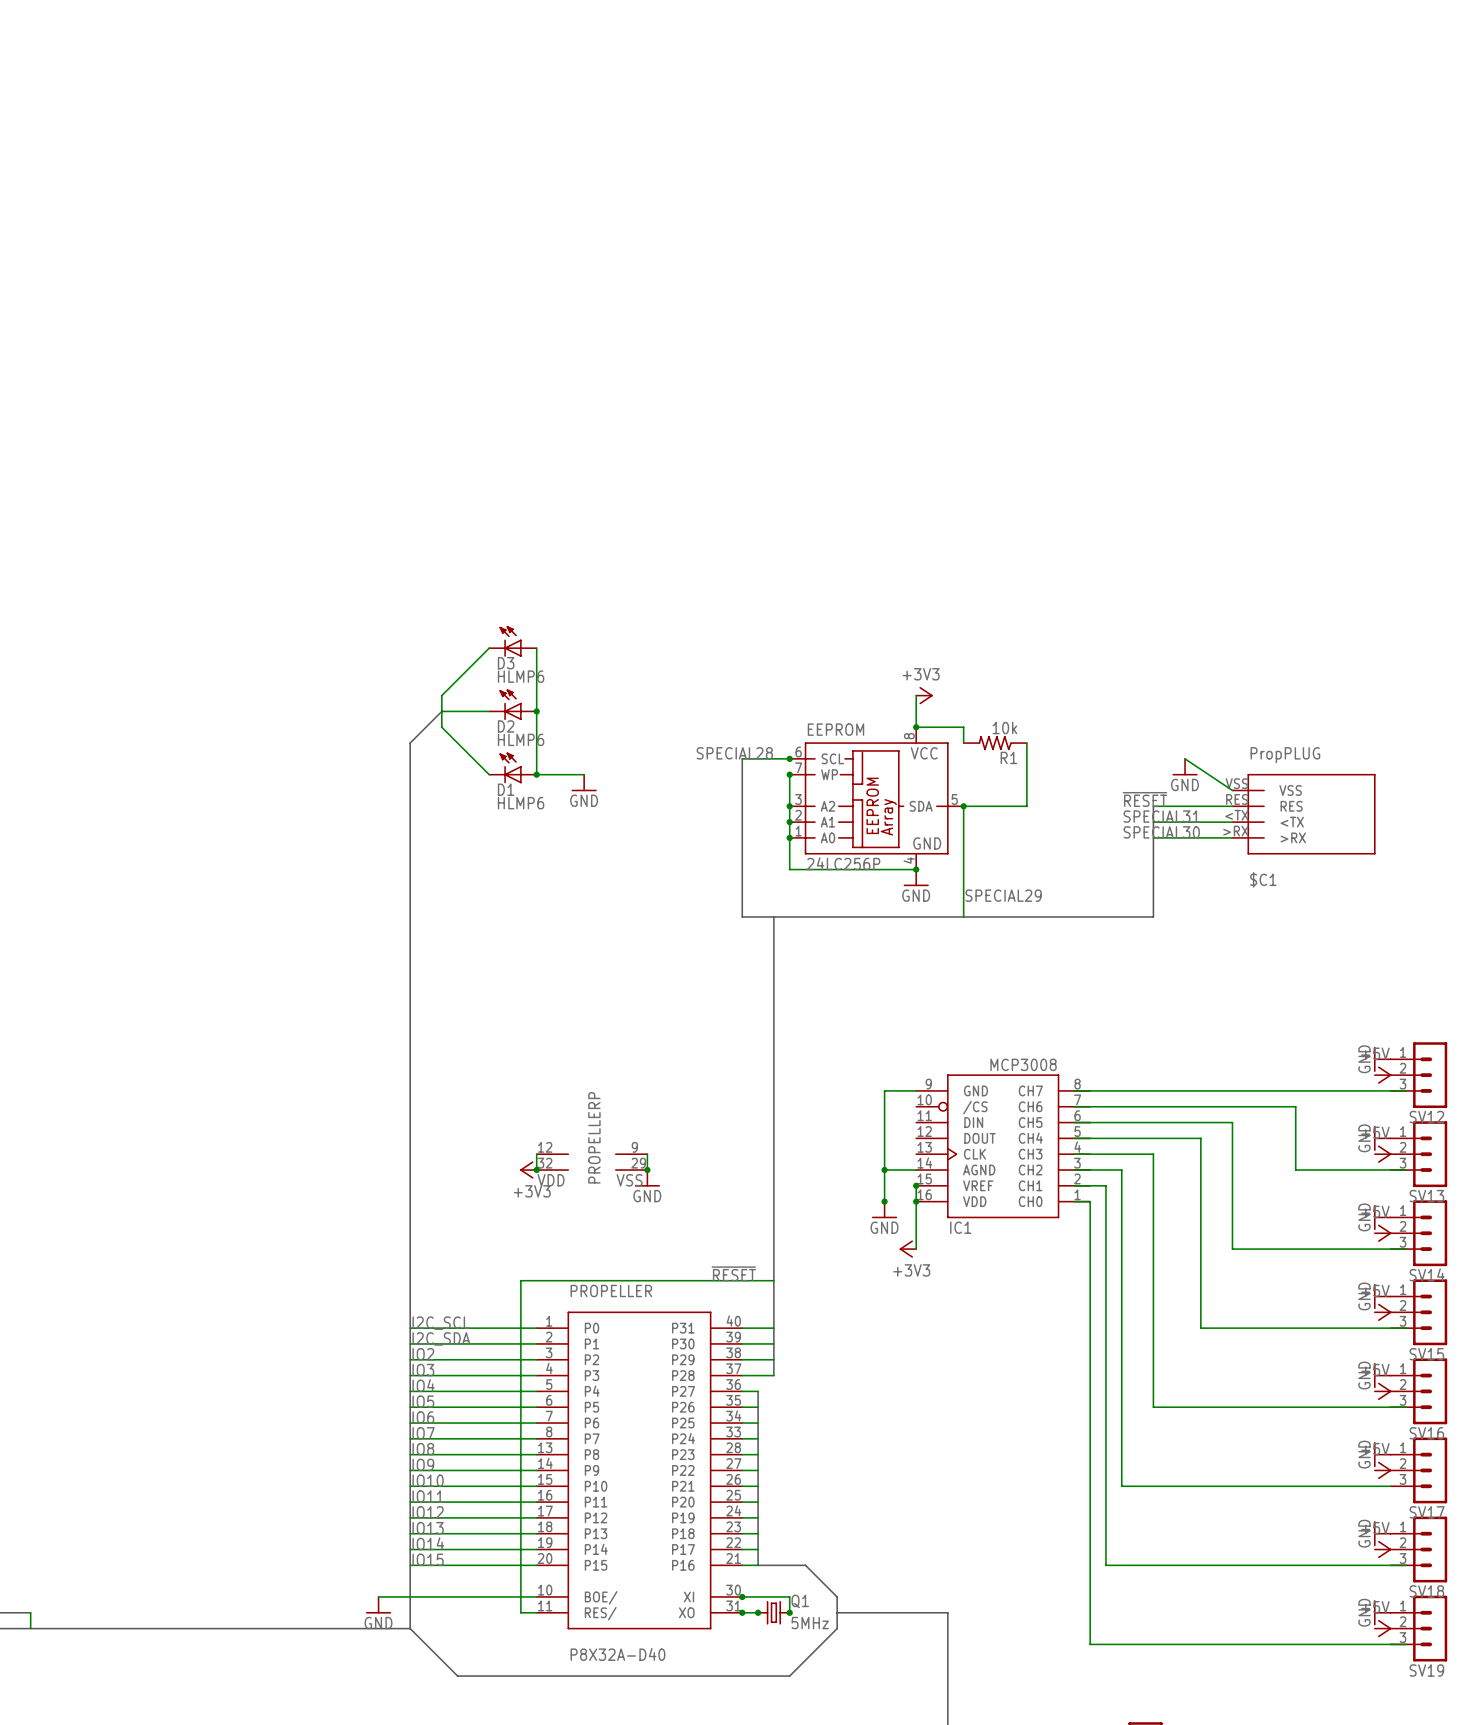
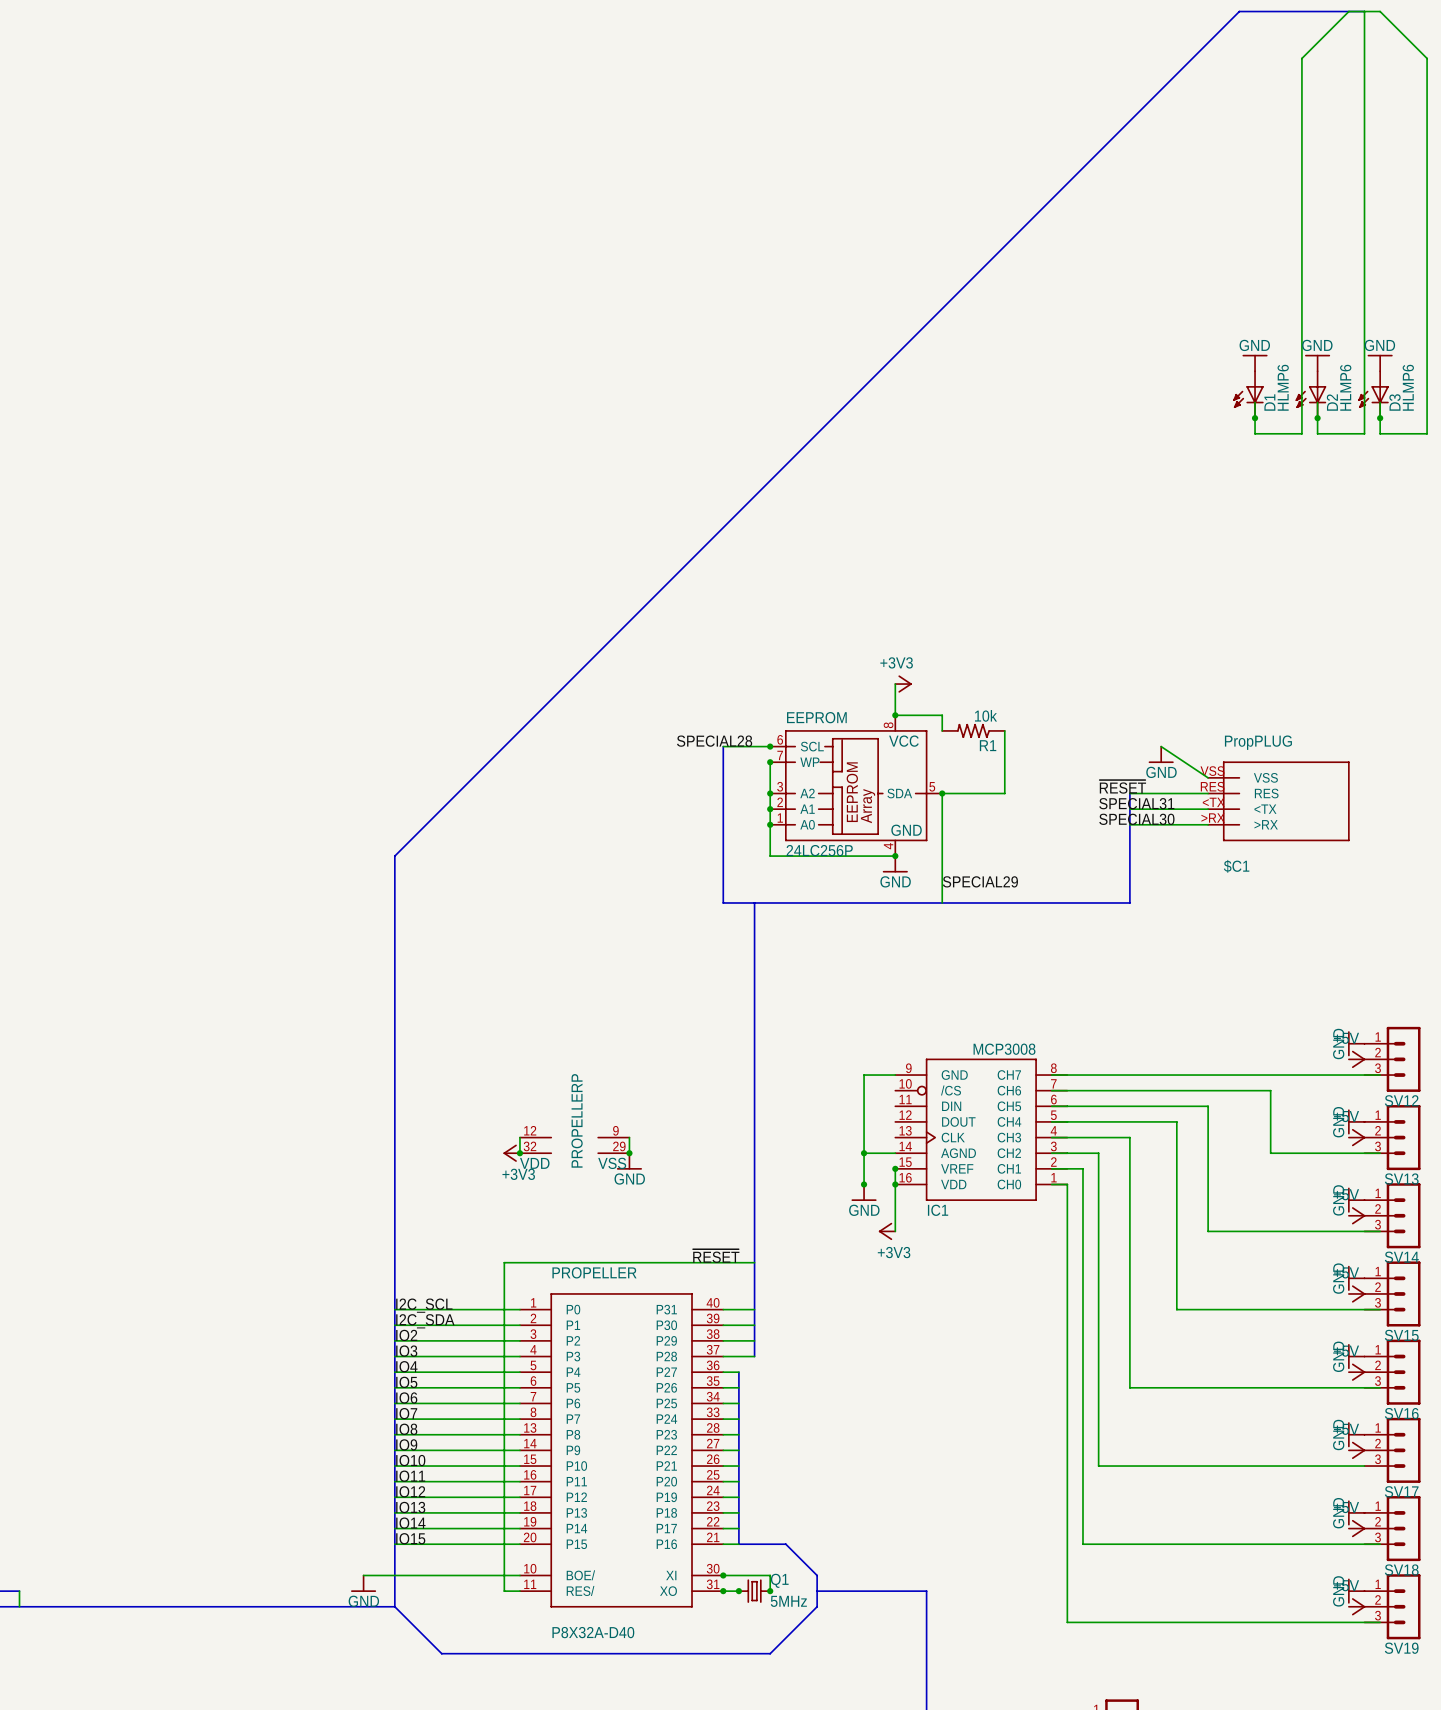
wire: none -> (1364, 11) (1364, 433) (1317, 433) (1317, 402)
power symbol: none -> GND (1255, 363)
power symbol: none -> GND (1317, 363)
power symbol: none -> GND (1380, 363)
wire: none -> (1255, 402) (1255, 433) (1301, 433) (1301, 58) (1348, 11) (1380, 11) (1427, 58) (1427, 433) (1380, 433) (1380, 402)
junction: none -> (1255, 418)
junction: none -> (1317, 418)
junction: none -> (1380, 418)
D3 position: (513, 641) -> (1373, 394)
D3 rotation: 0° (518, 641) -> 90° counterclockwise (1373, 389)
wire: (489, 648) (441, 695) (441, 727) (489, 774) -> none
wire: (536, 648) (536, 774) (584, 774) -> none
D2 position: (513, 704) -> (1311, 394)
D2 rotation: 0° (518, 704) -> 90° counterclockwise (1311, 389)
bus: (441, 711) (410, 743) (410, 869) -> (1364, 11) (1239, 11) (394, 856)
wire: (441, 711) (489, 711) -> none
junction: (536, 711) -> none
D1 position: (513, 768) -> (1248, 394)
D1 rotation: 0° (518, 768) -> 90° counterclockwise (1248, 389)
junction: (536, 774) -> none
power symbol: GND (584, 782) -> none

